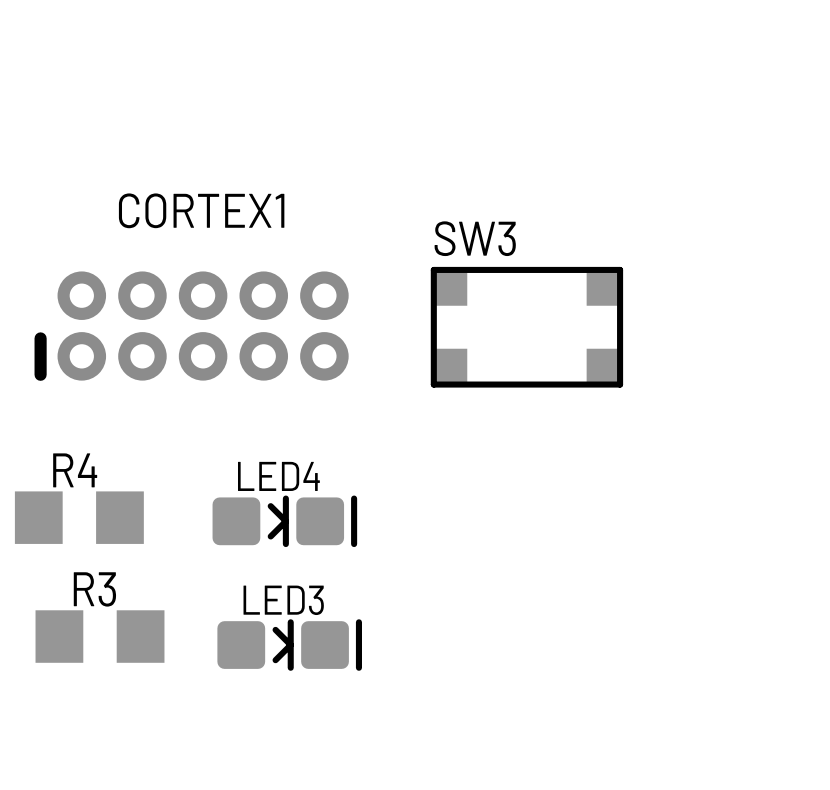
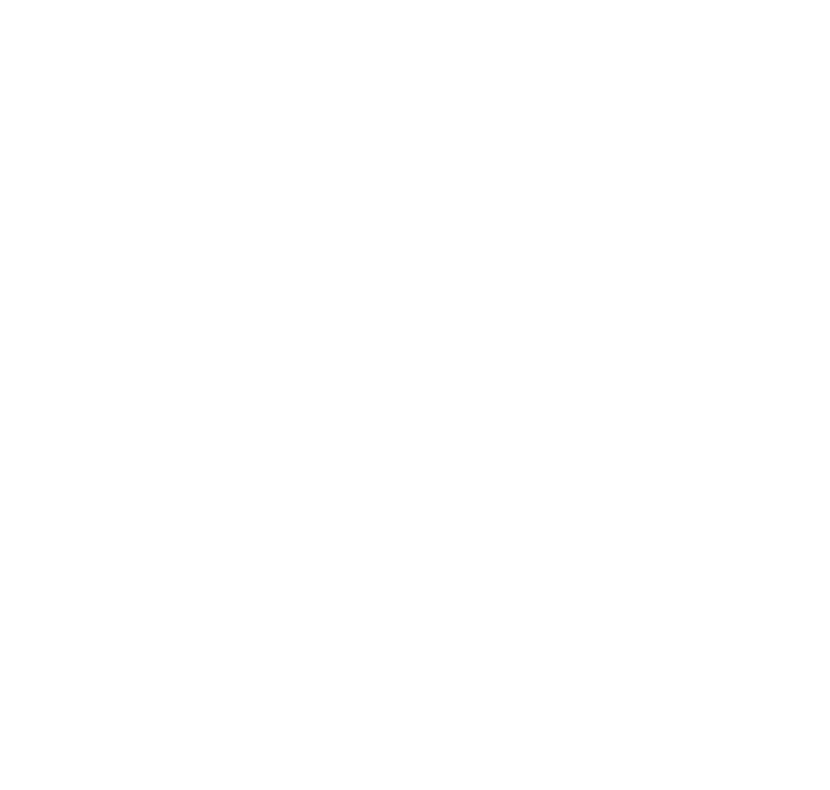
CORTEX1: (191, 326) -> none
SW3: (526, 327) -> none
R4: (79, 517) -> none
LED4: (284, 521) -> none
R3: (100, 636) -> none
LED3: (289, 645) -> none

